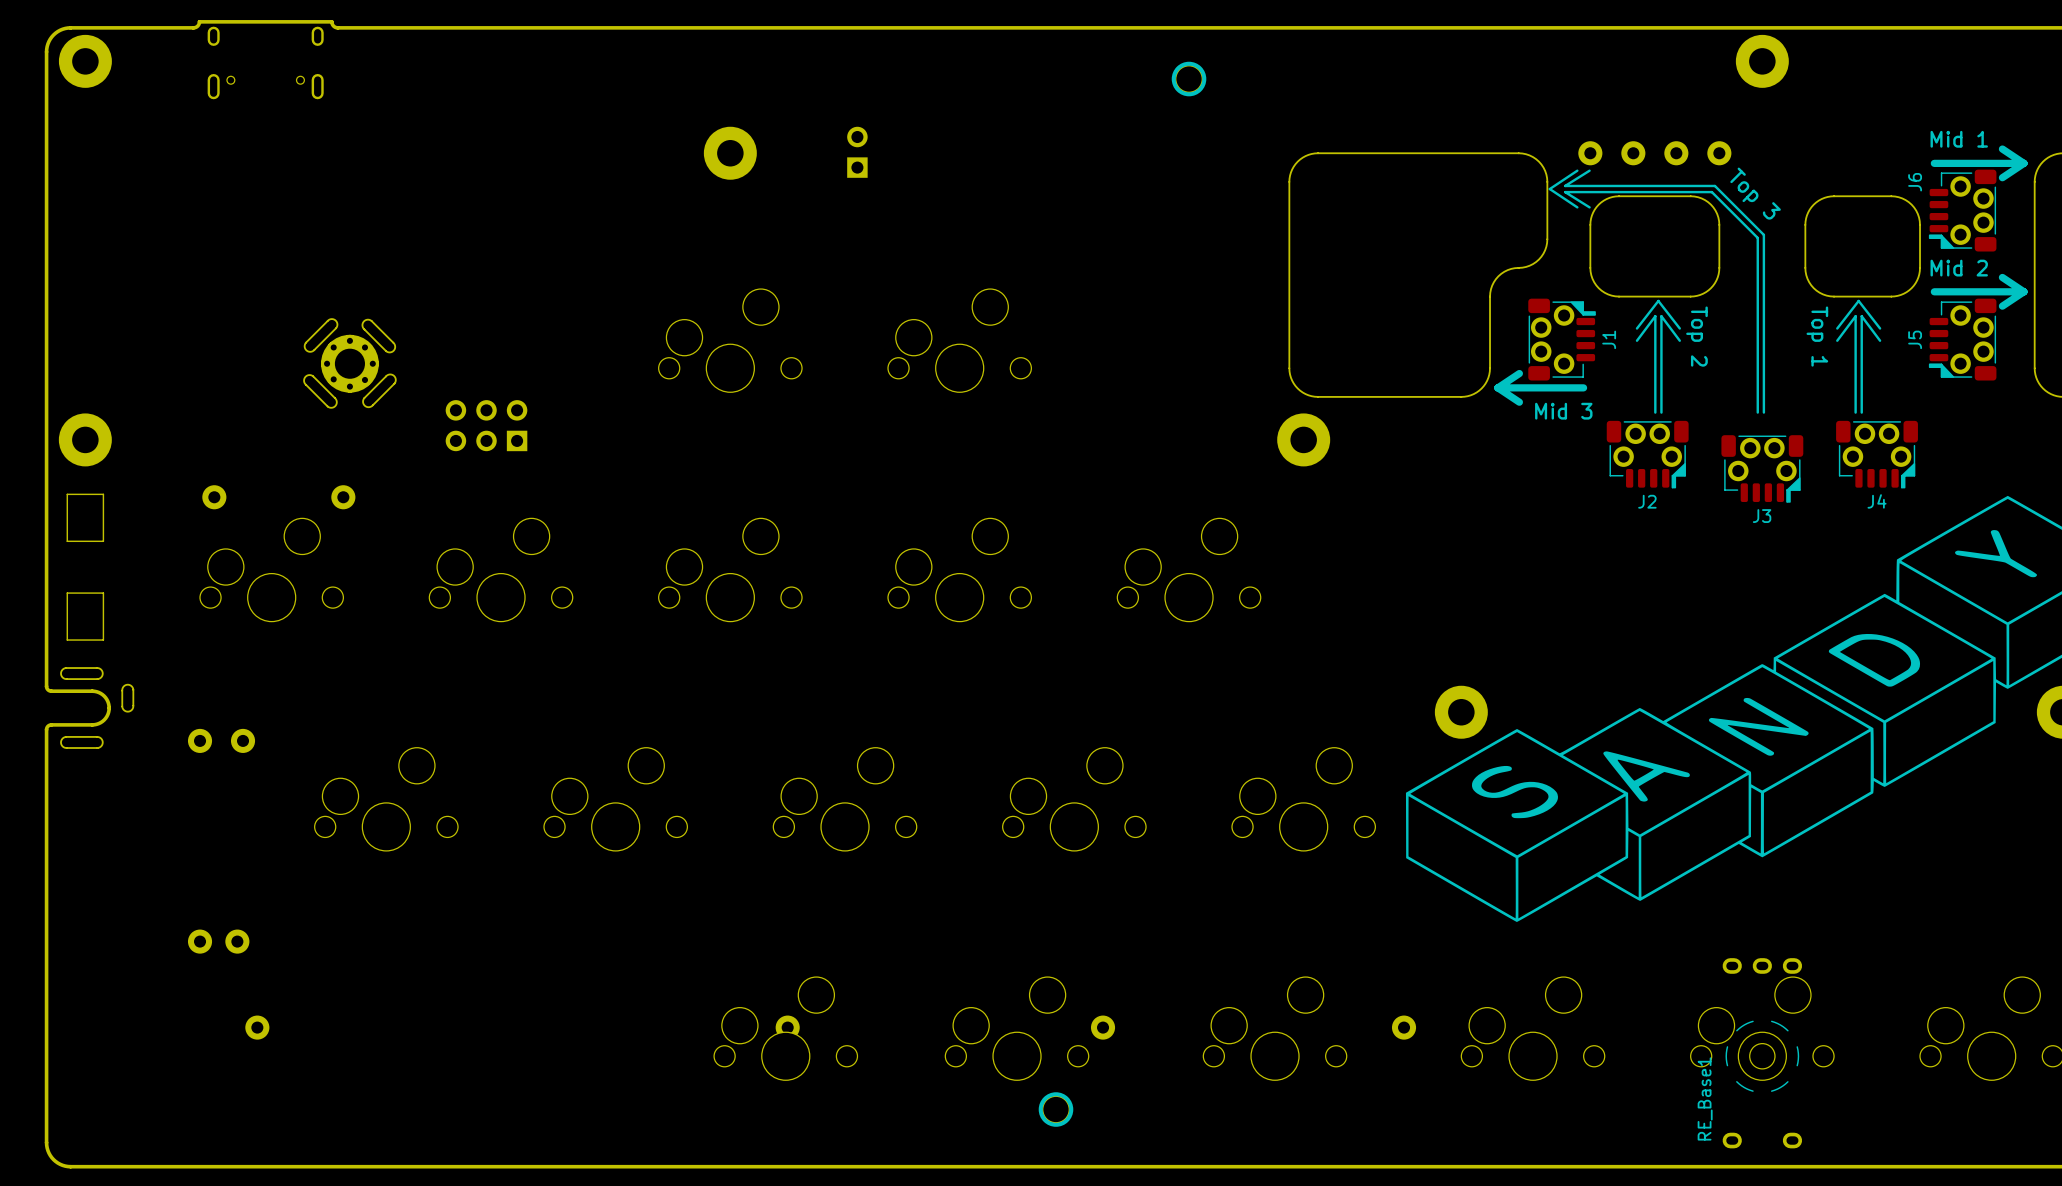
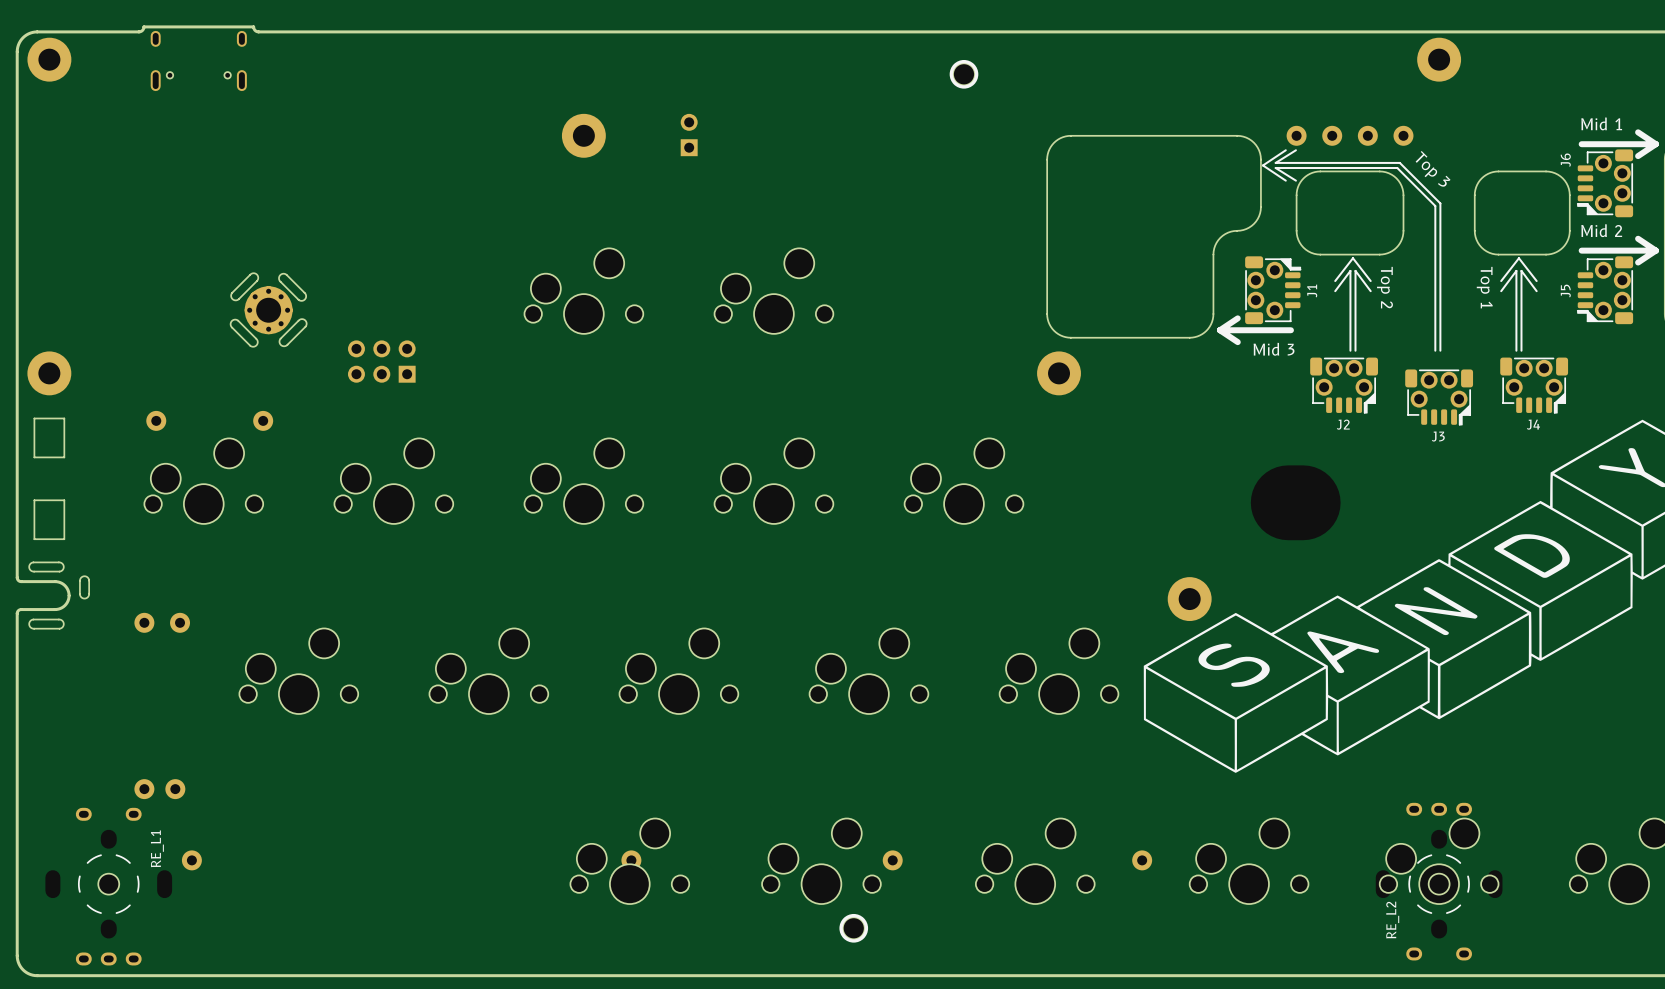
RE_L1: none -> (108, 886)
RE_Base1 name: RE_Base1 (1705, 1098) -> RE_L2 (1392, 920)

